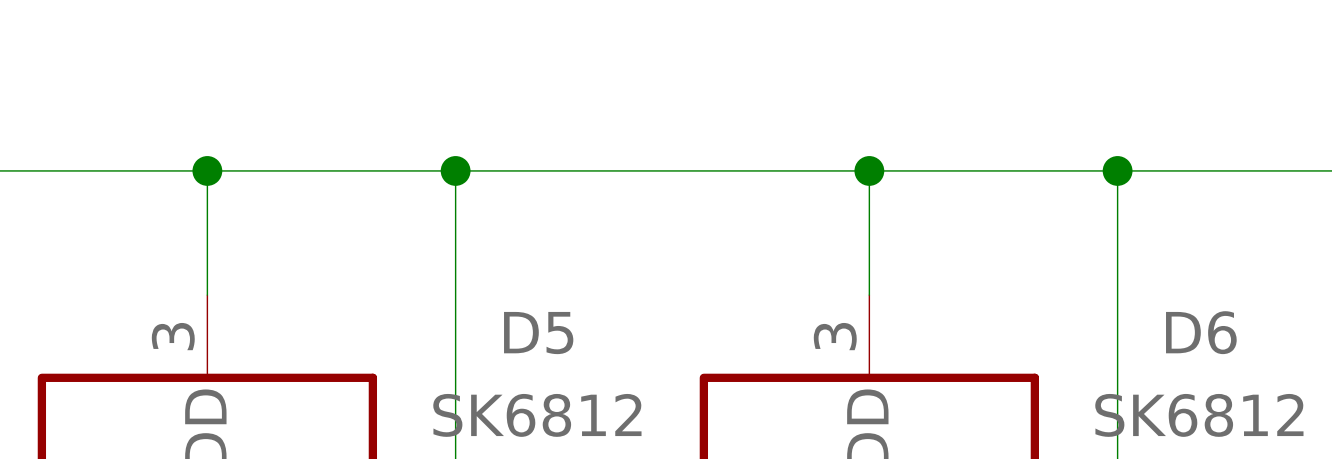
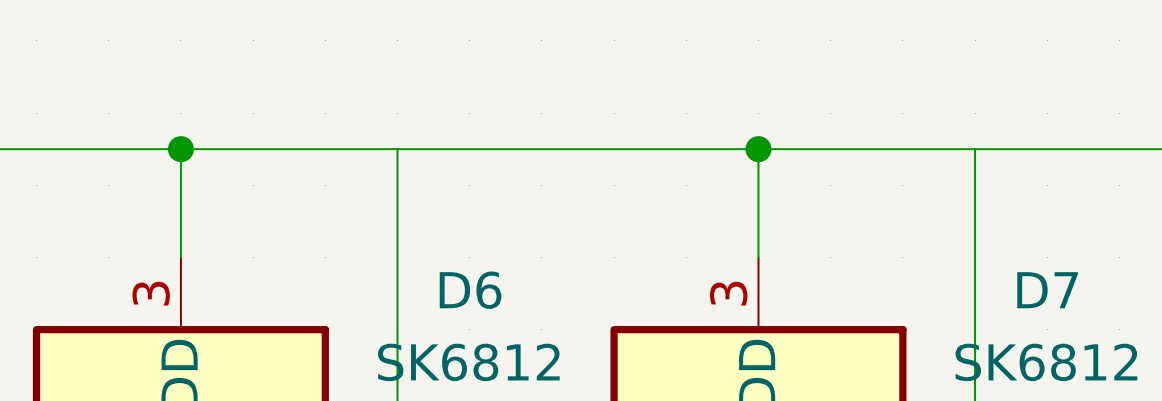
junction: (455, 170) -> none
junction: (1117, 170) -> none
D6 name: D6 (1201, 332) -> D7 (1047, 290)
D5 name: D5 (538, 333) -> D6 (470, 290)

